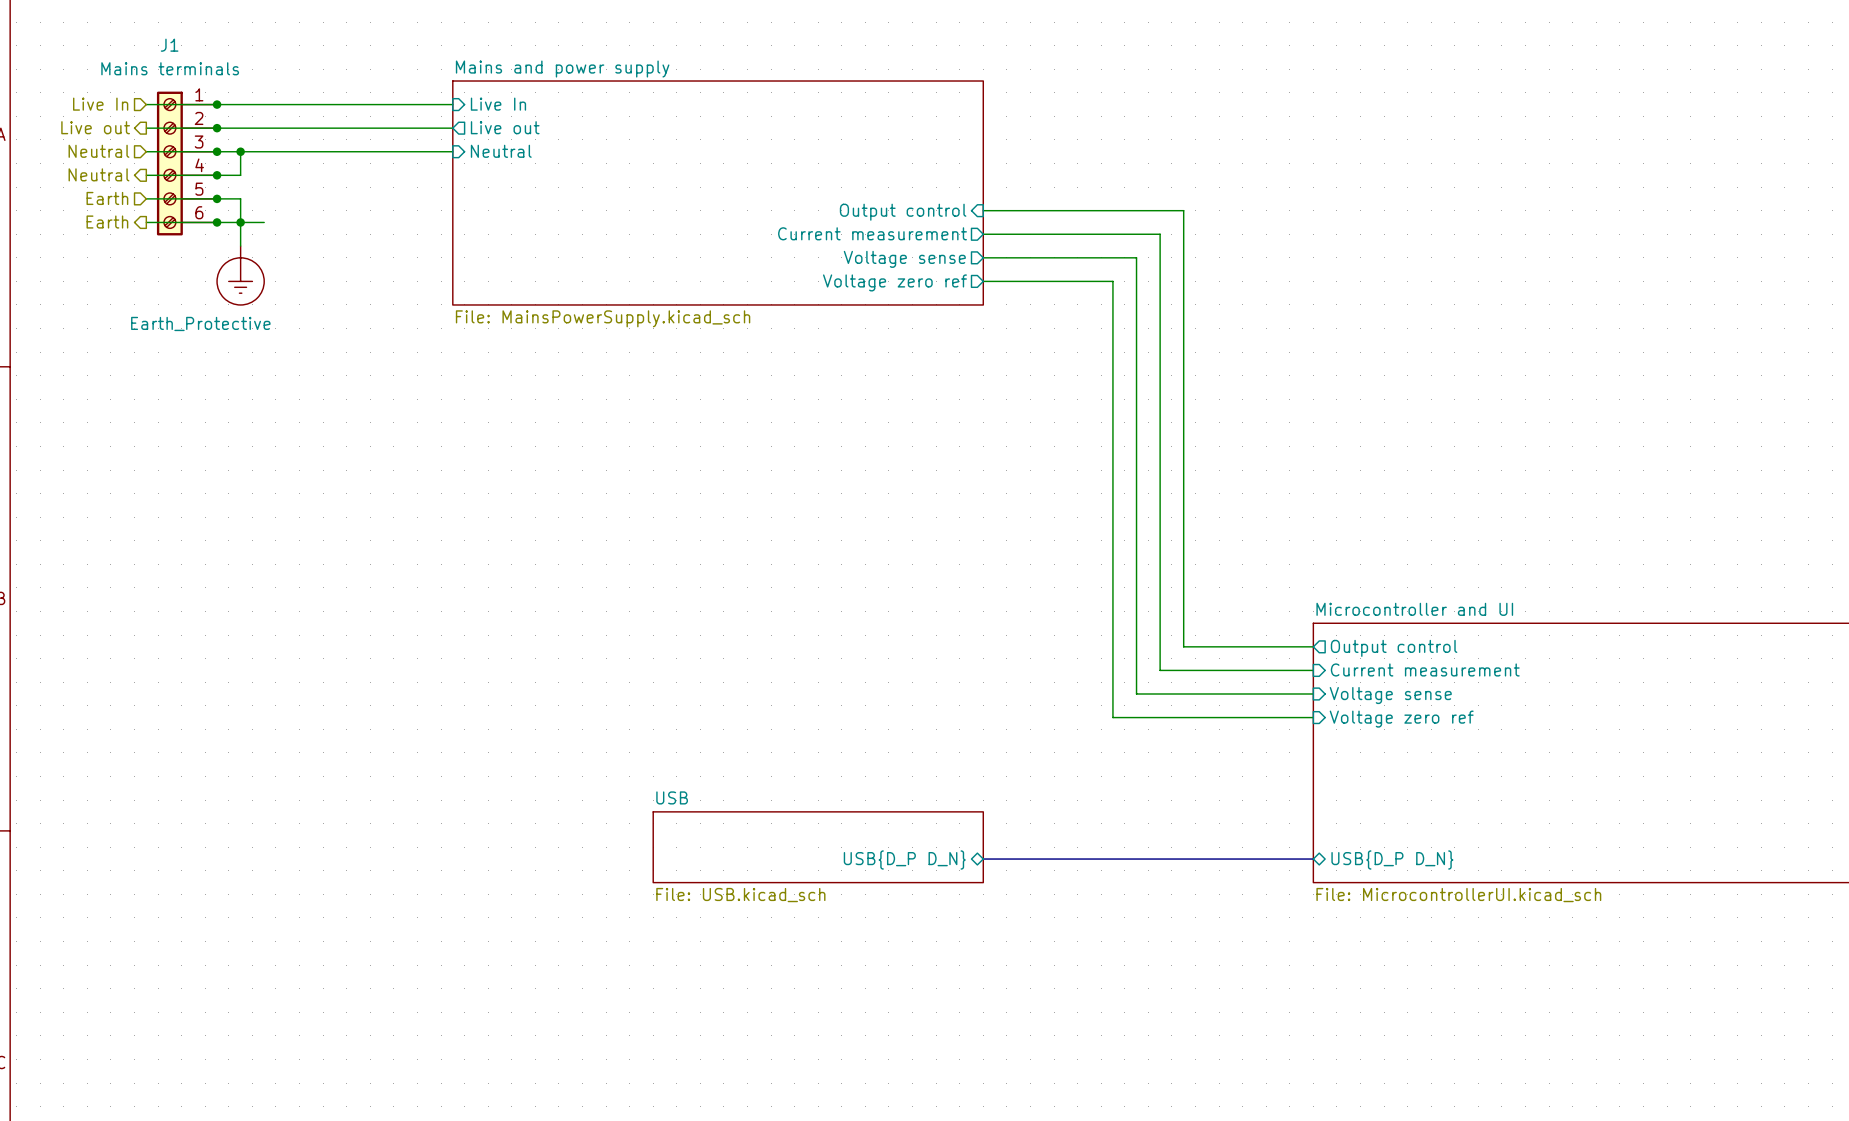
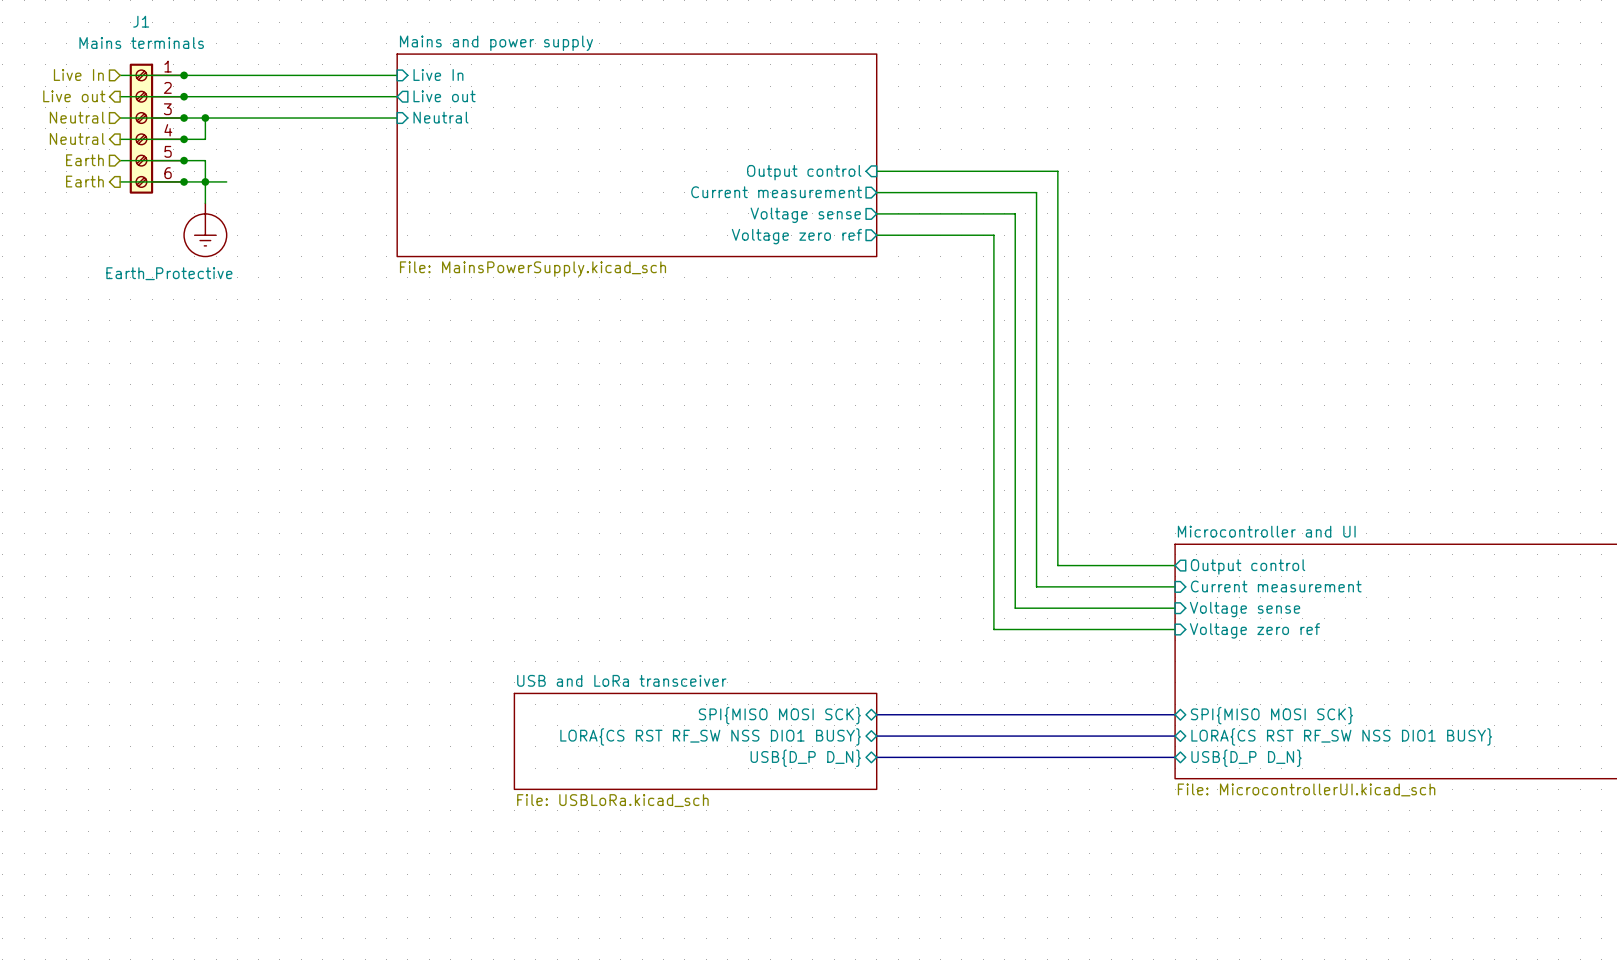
bus: none -> (876, 714) (1175, 714)
sheet pin: none -> SPI{MISO MOSI SCK} (779, 715)
sheet pin: none -> SPI{MISO MOSI SCK} (1271, 715)
bus: none -> (876, 736) (1175, 736)
sheet pin: none -> LORA{CS RST RF_SW NSS DIO1 BUSY} (710, 736)
sheet pin: none -> LORA{CS RST RF_SW NSS DIO1 BUSY} (1341, 736)
sheet USB and LoRa transceiver: none -> File: USBLoRa.kicad_sch (695, 741)
sheet USB: File: USB.kicad_sch (818, 847) -> none

